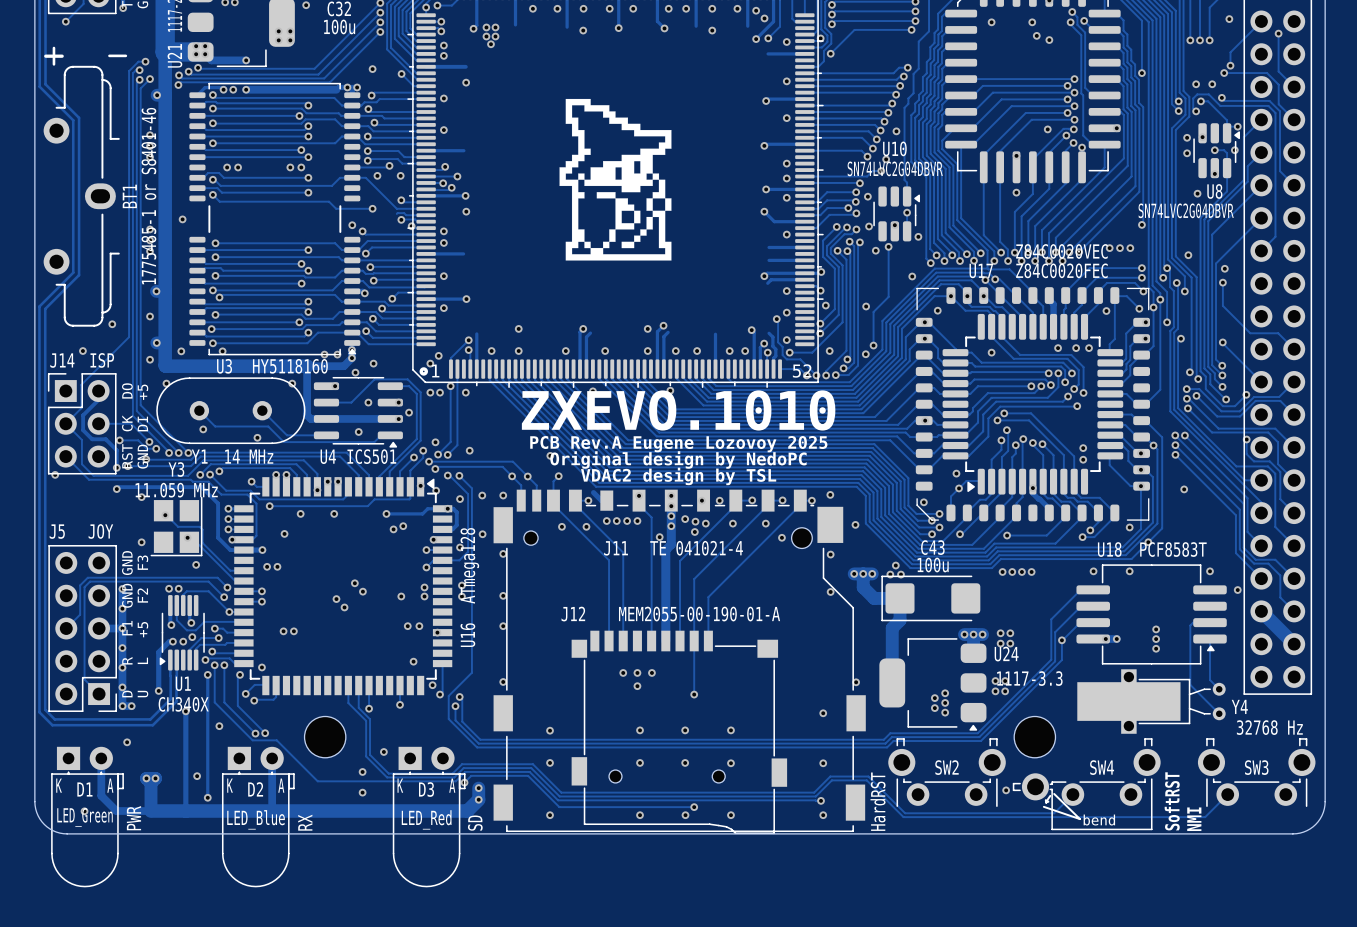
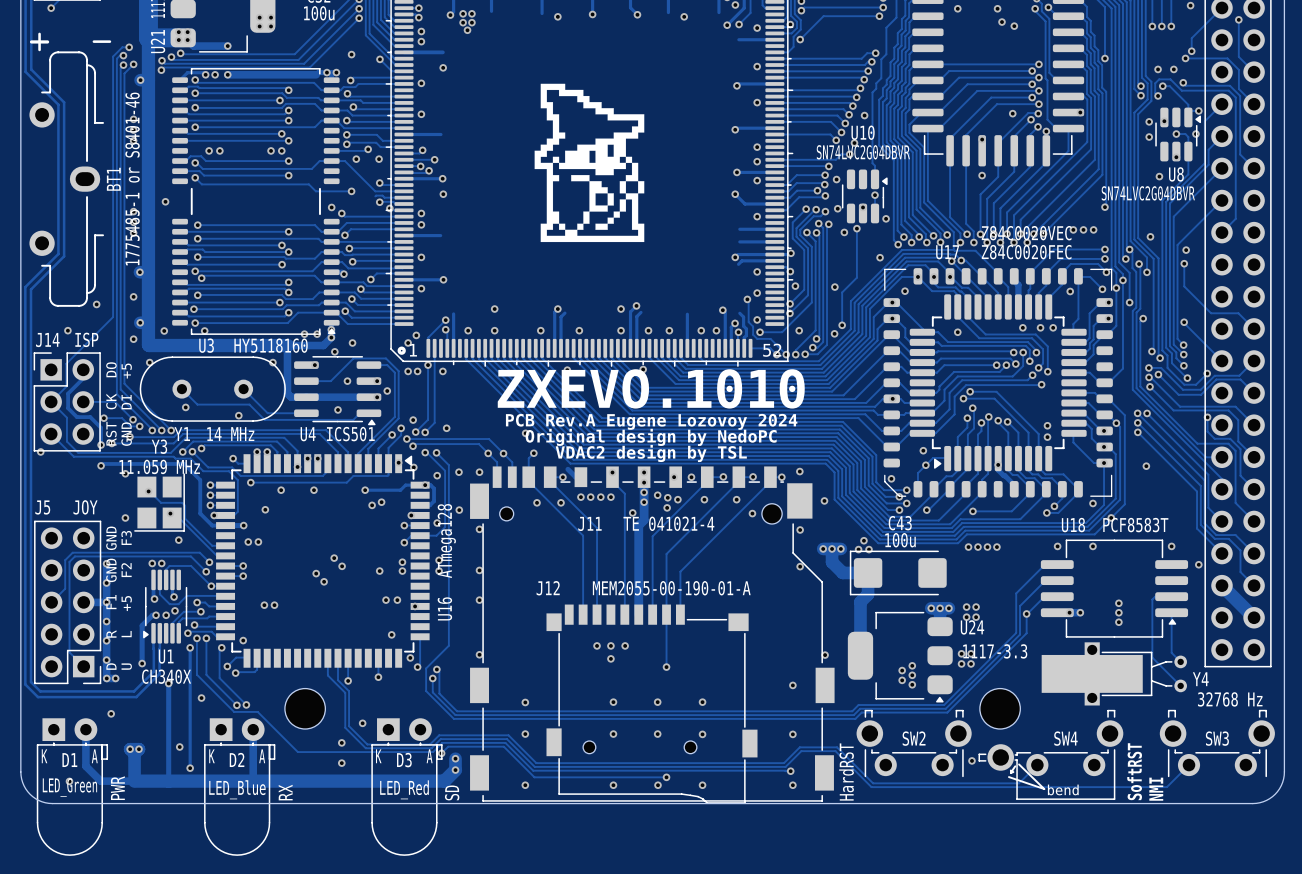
text: PCB Rev.A Eugene Lozovoy 2025 (678, 444) -> PCB Rev.A Eugene Lozovoy 2024 (651, 421)

